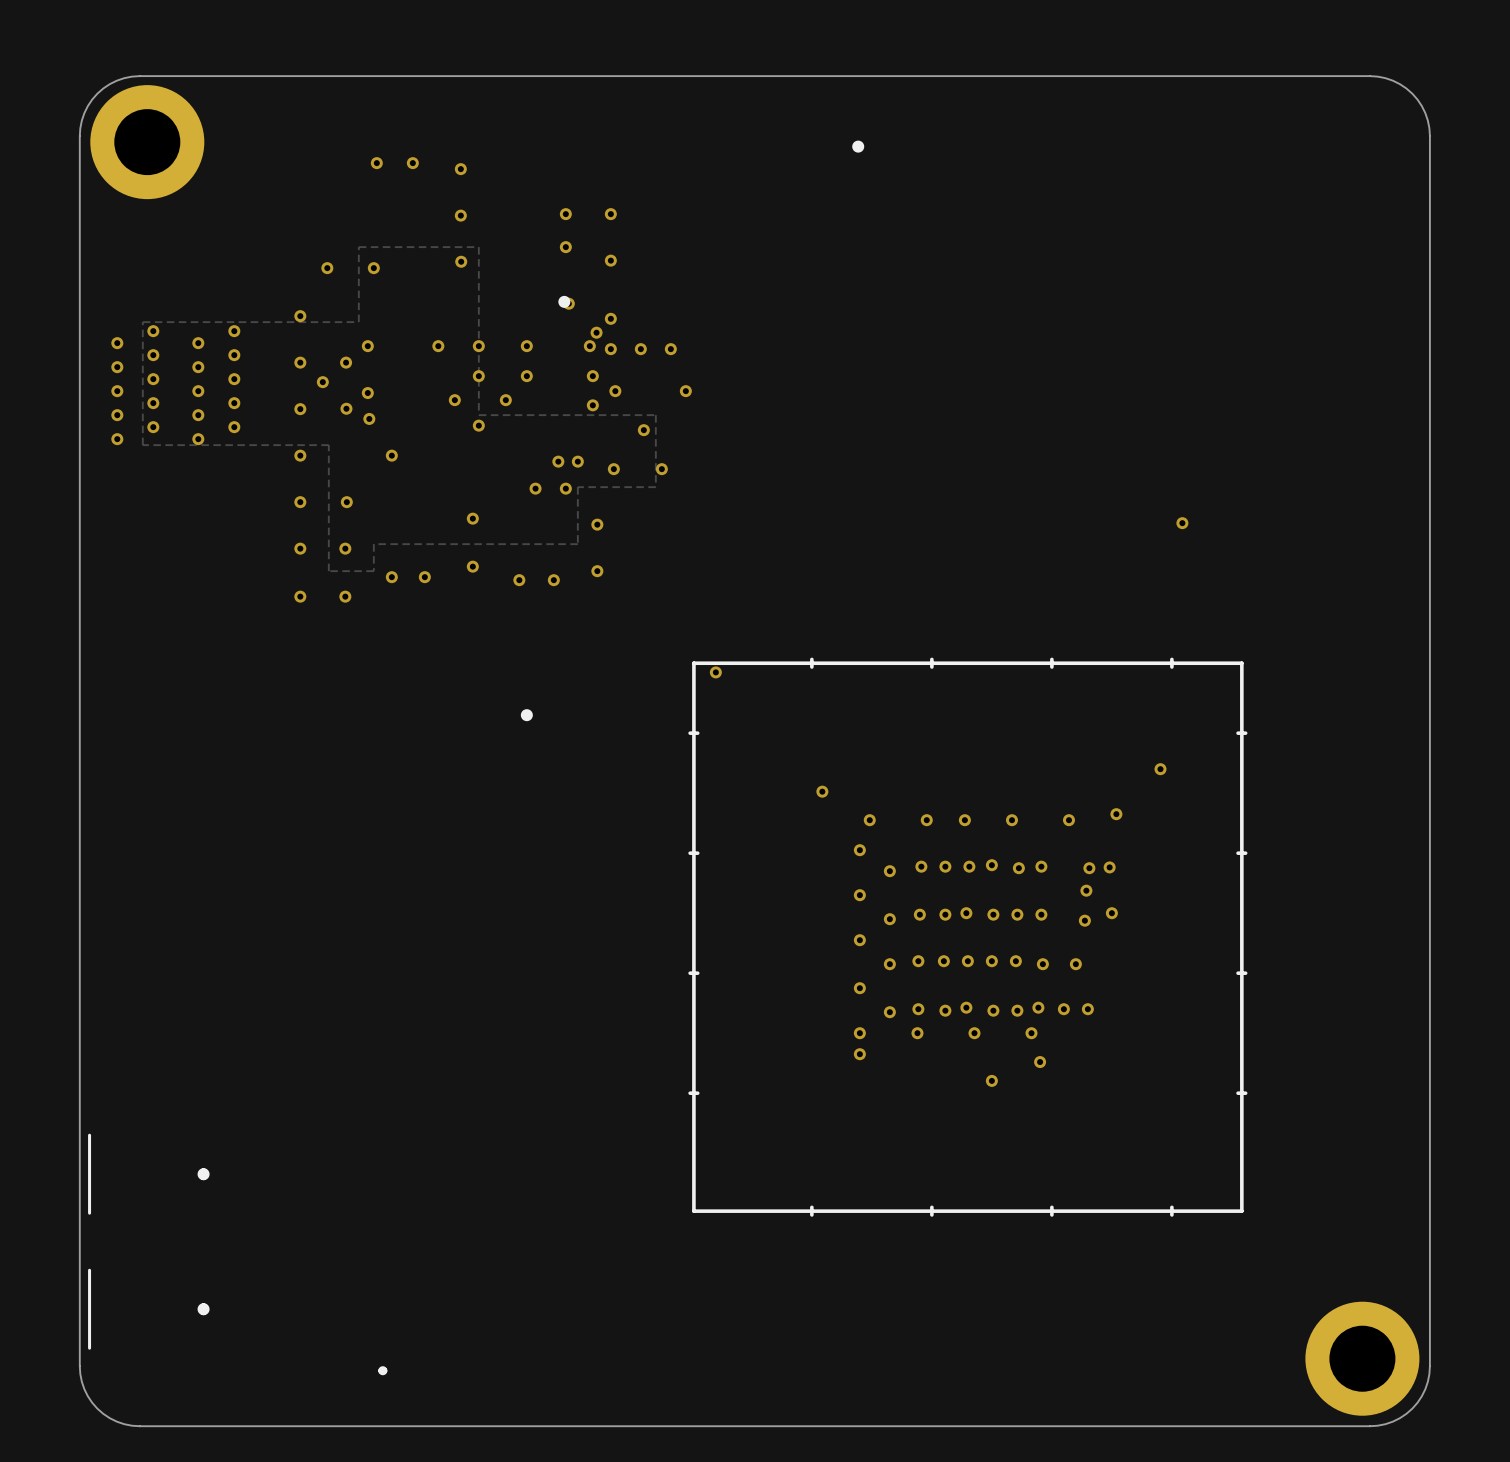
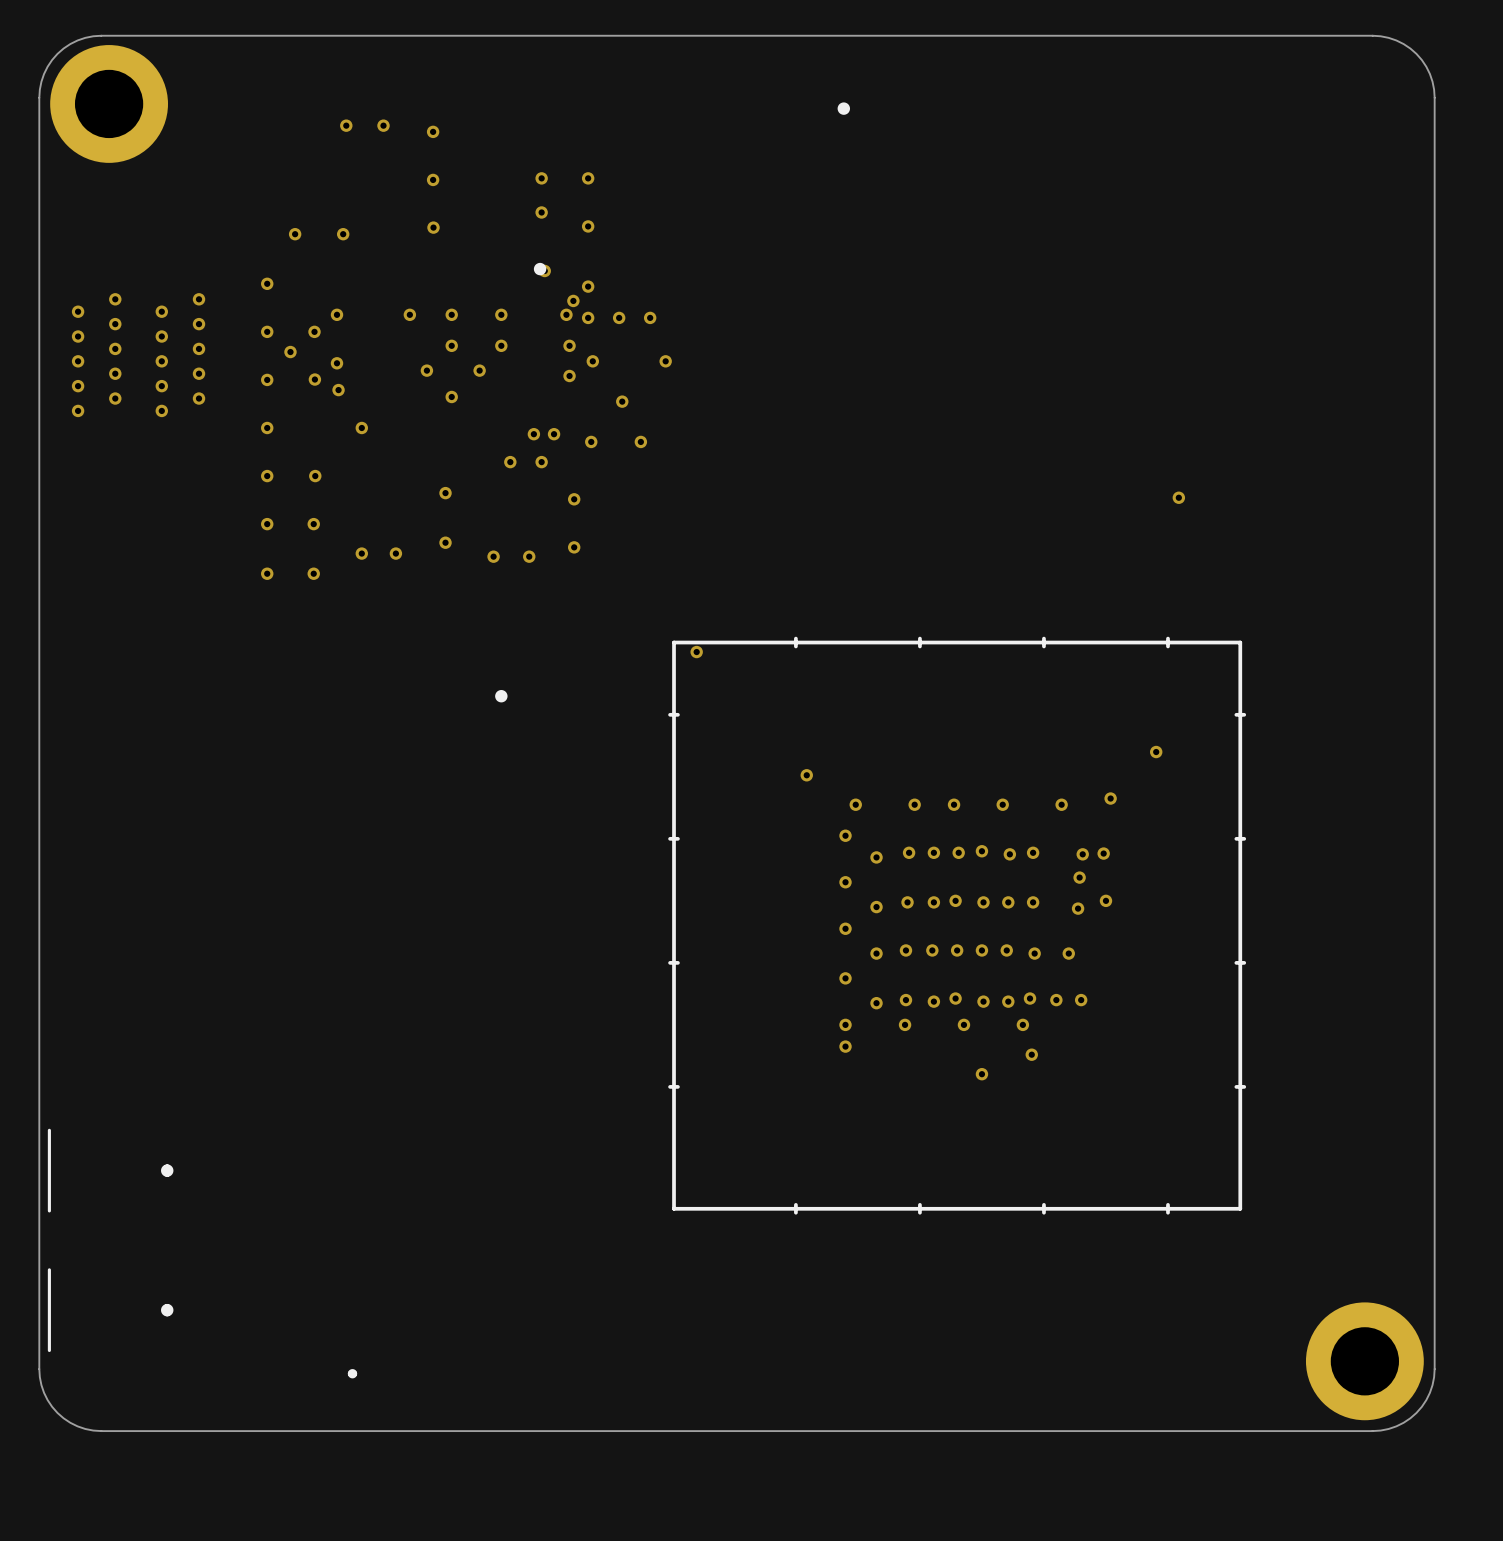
zone outline: (358, 247) (358, 322) (142, 322) (142, 445) (328, 445) (328, 571) (373, 571) (373, 544) (577, 544) (577, 487) (655, 487) (655, 415) (478, 415) (478, 247) (358, 247) -> none

